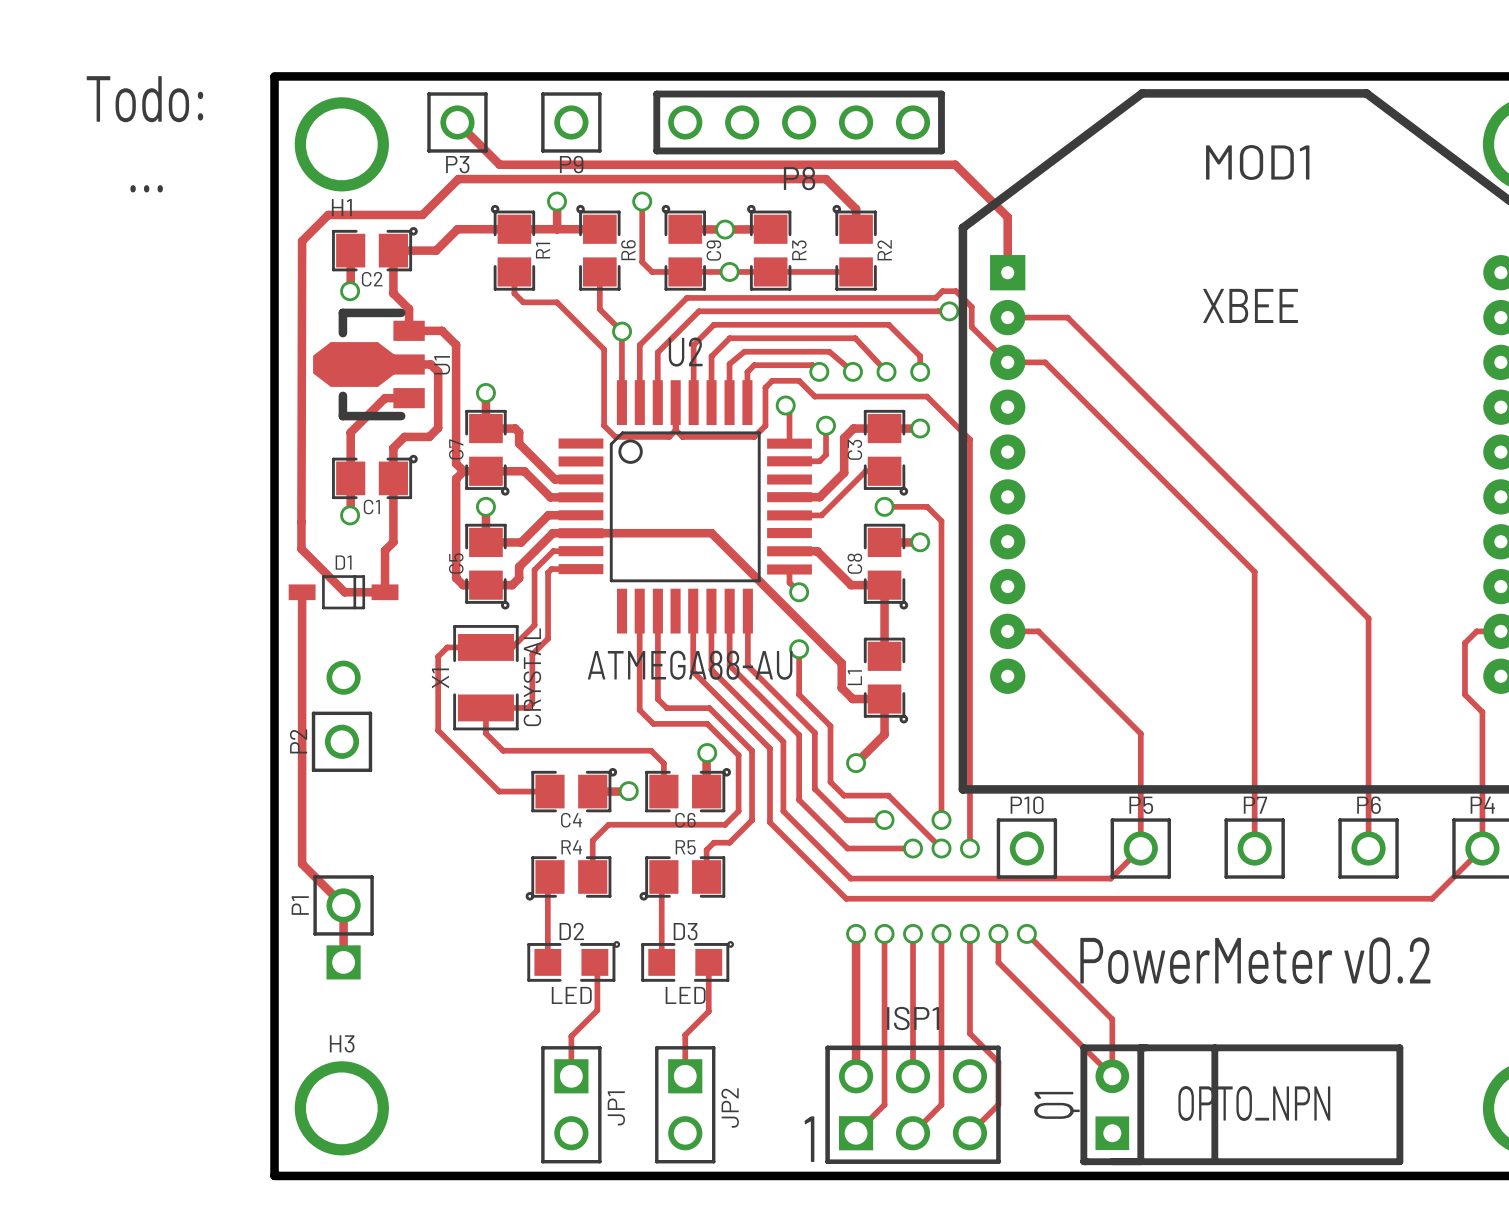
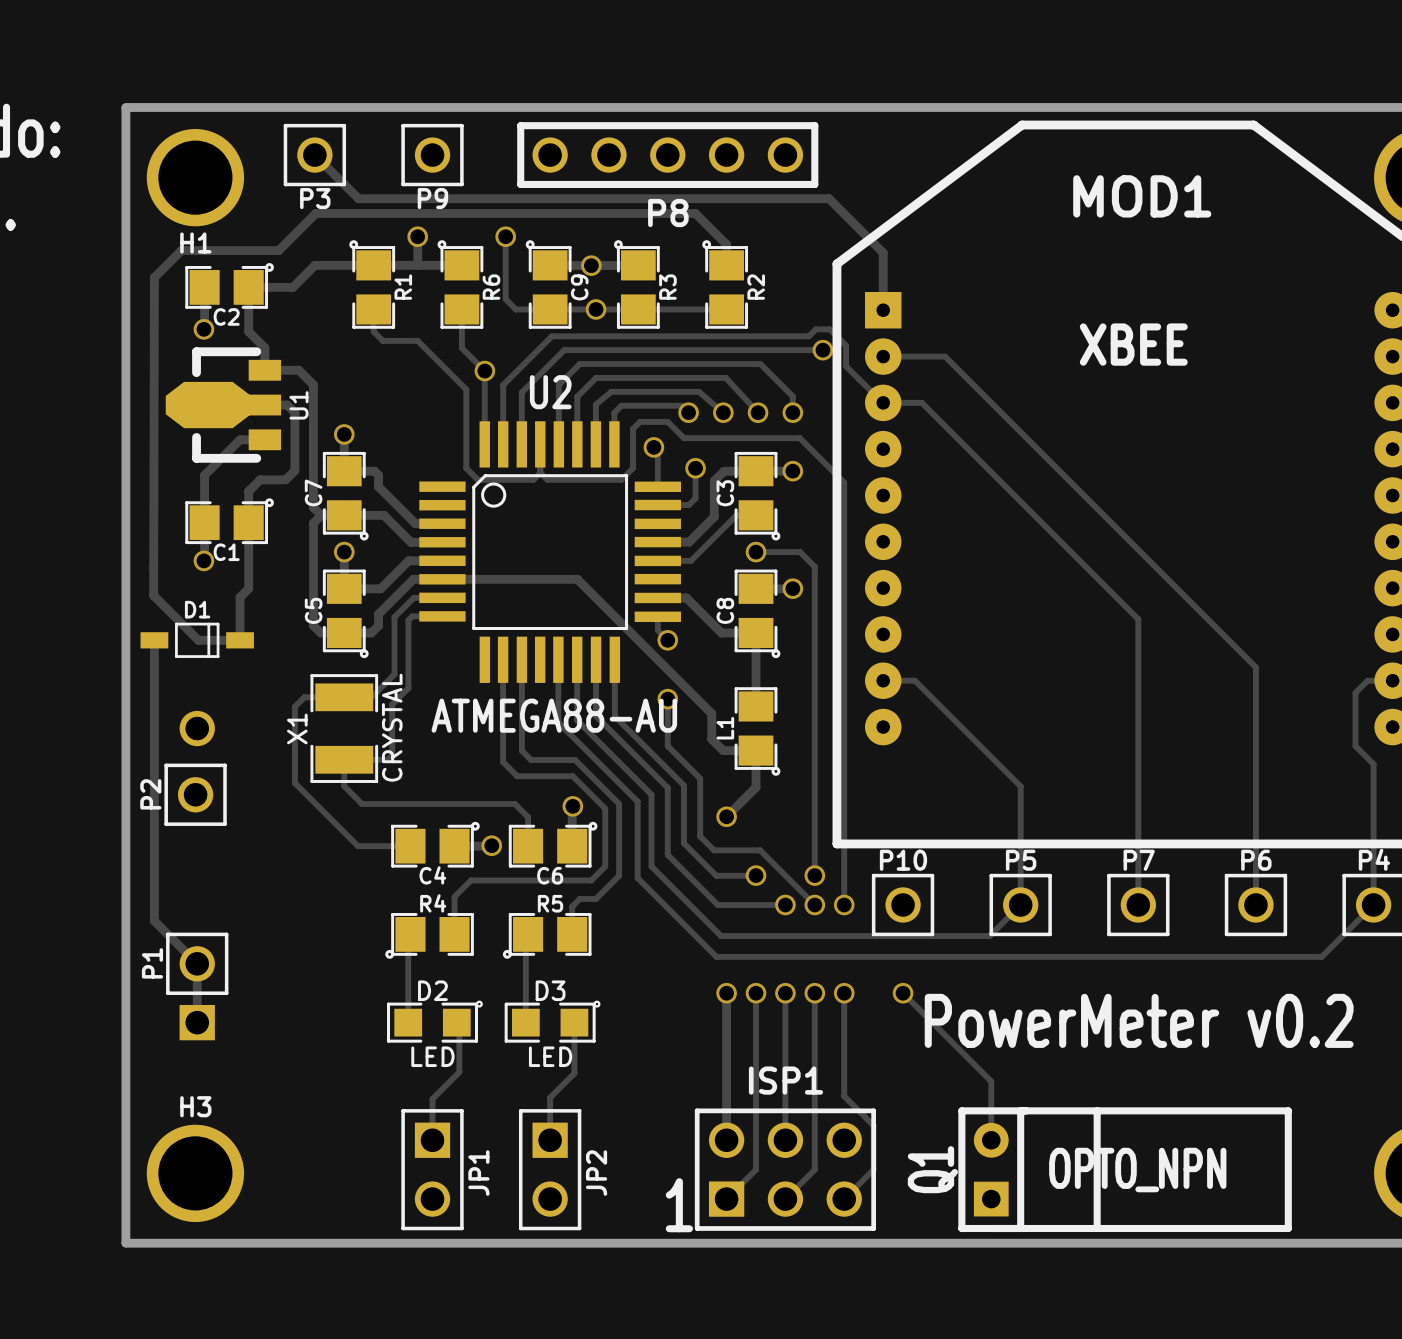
track: (998, 933) (998, 962) (1112, 1076) -> none
via: (998, 933) -> none

